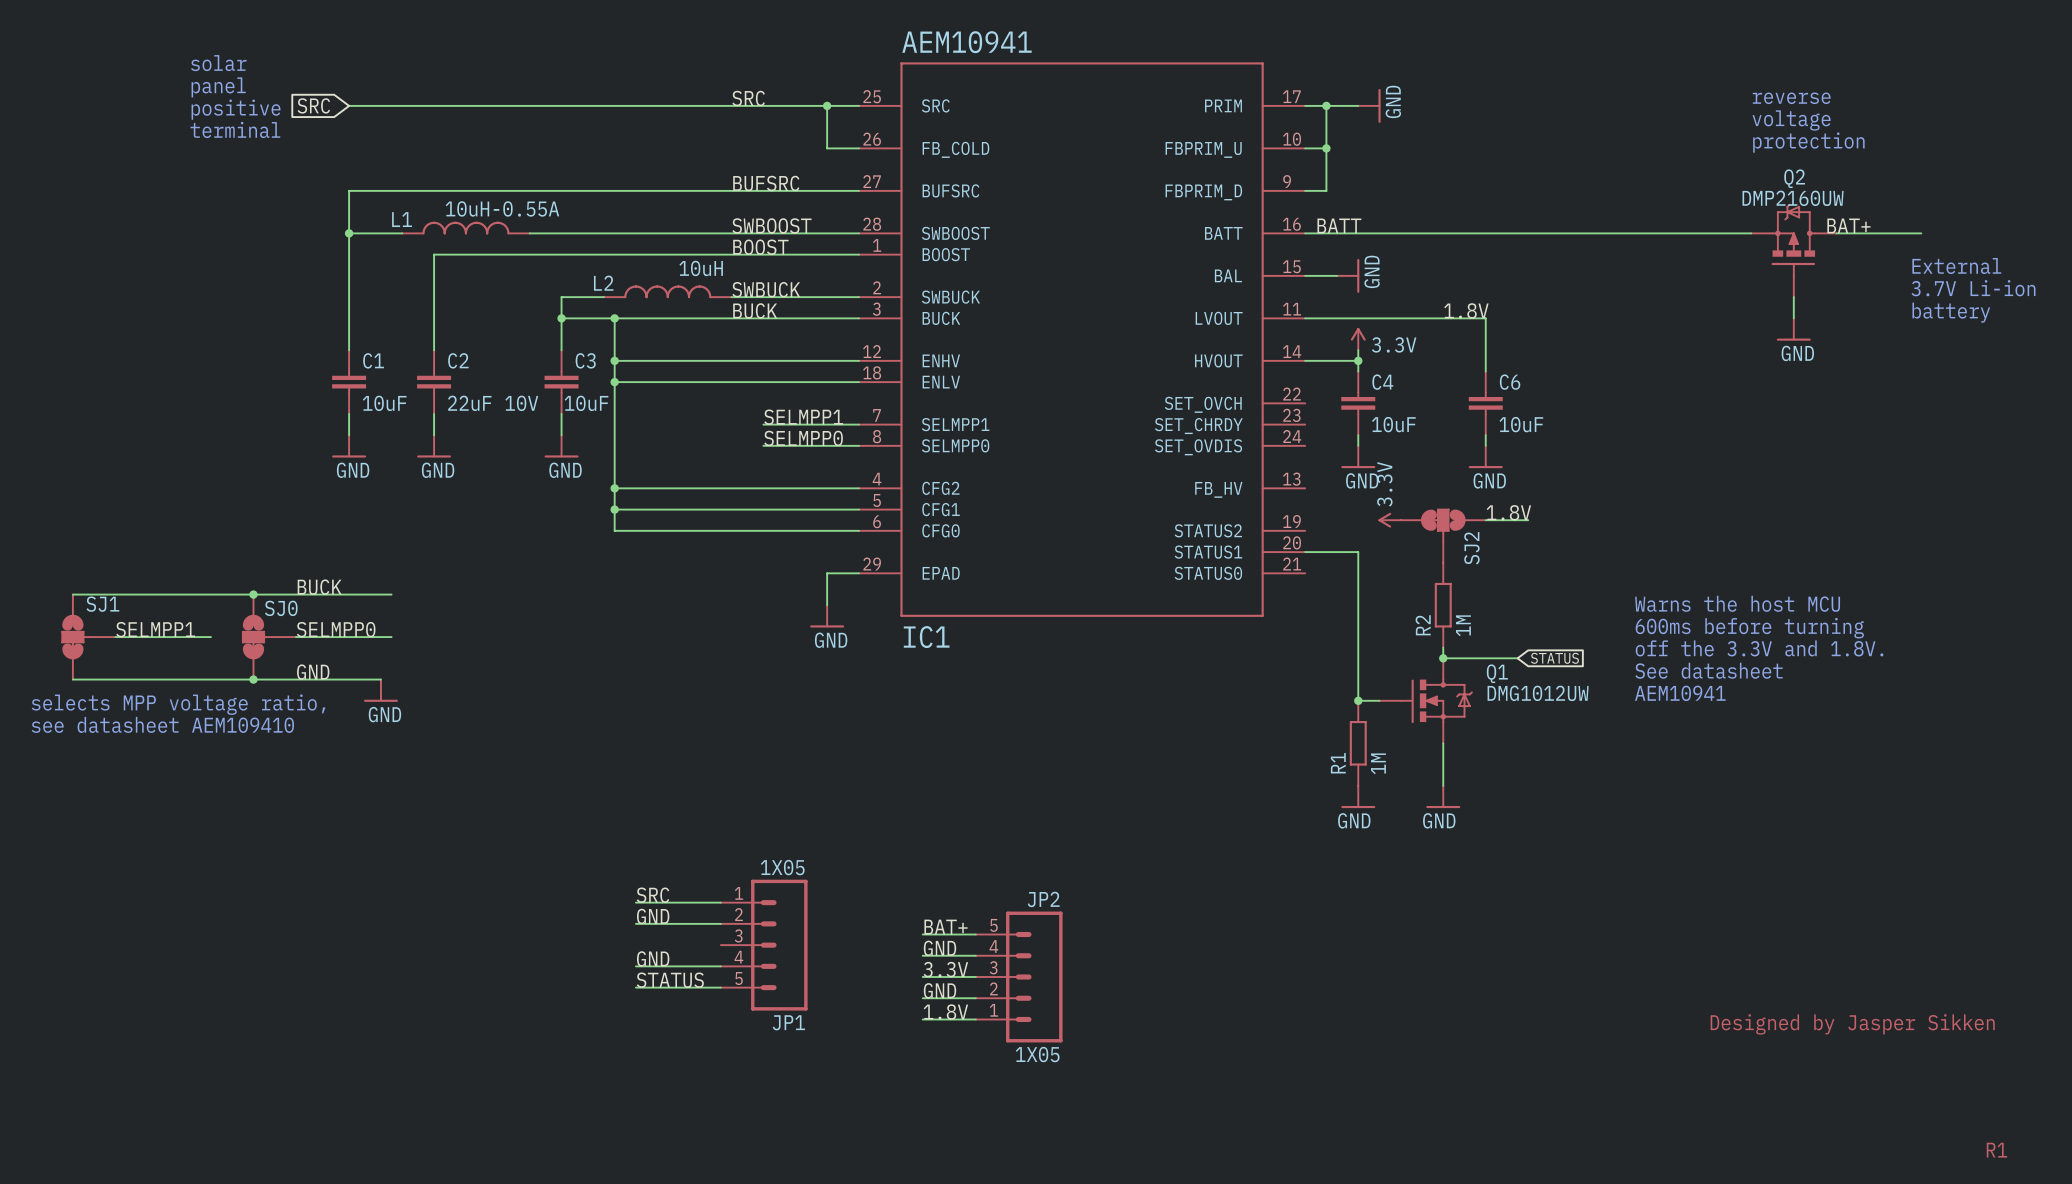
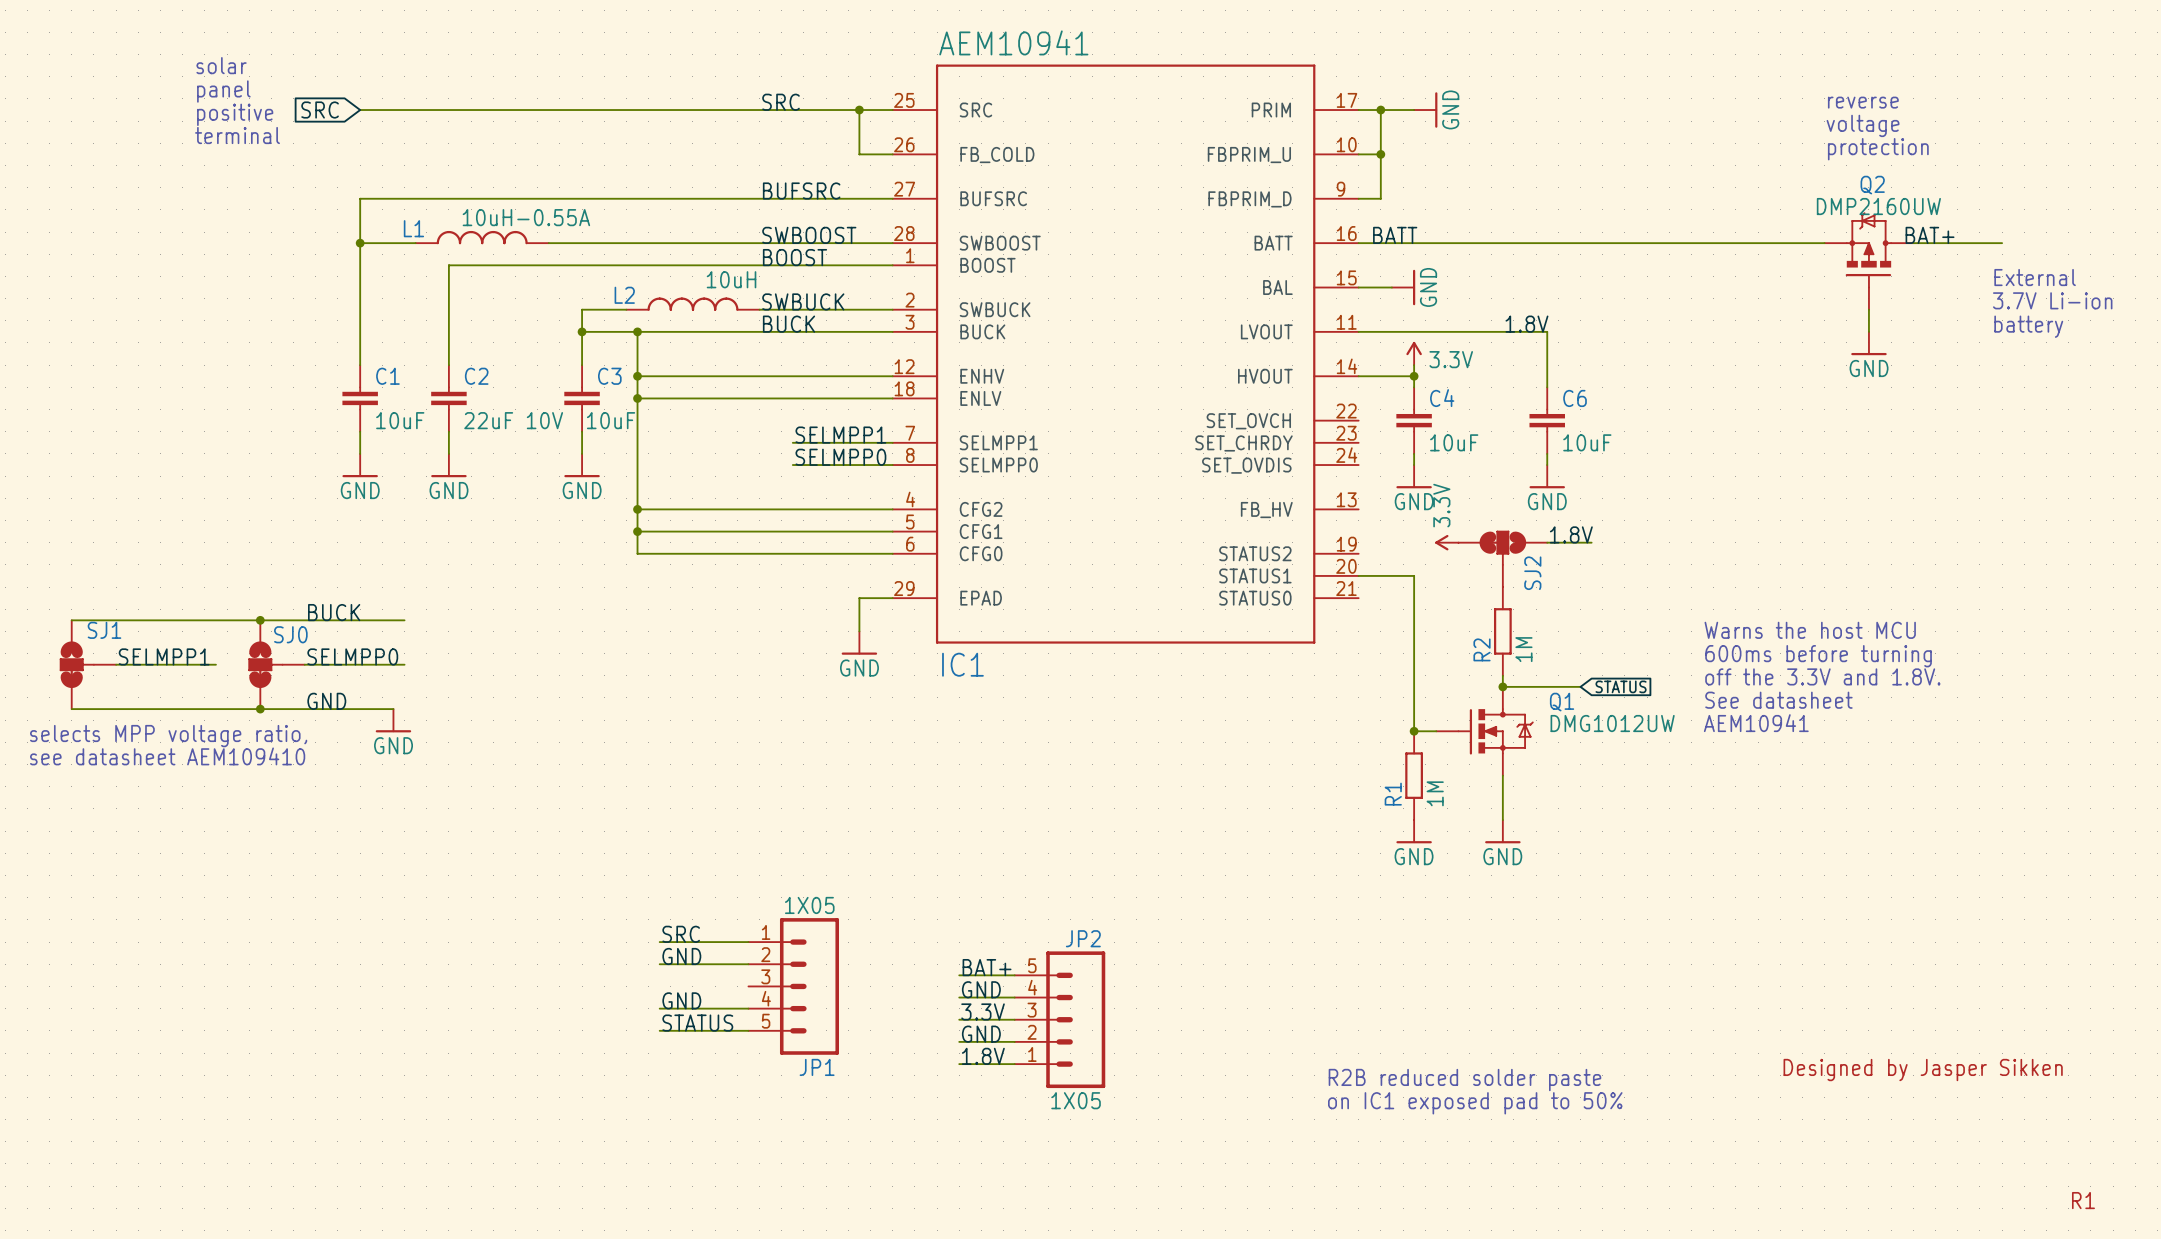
text: none -> R2B reduced solder paste (1464, 1080)
text: none -> on IC1 exposed pad to 50% (1475, 1103)

